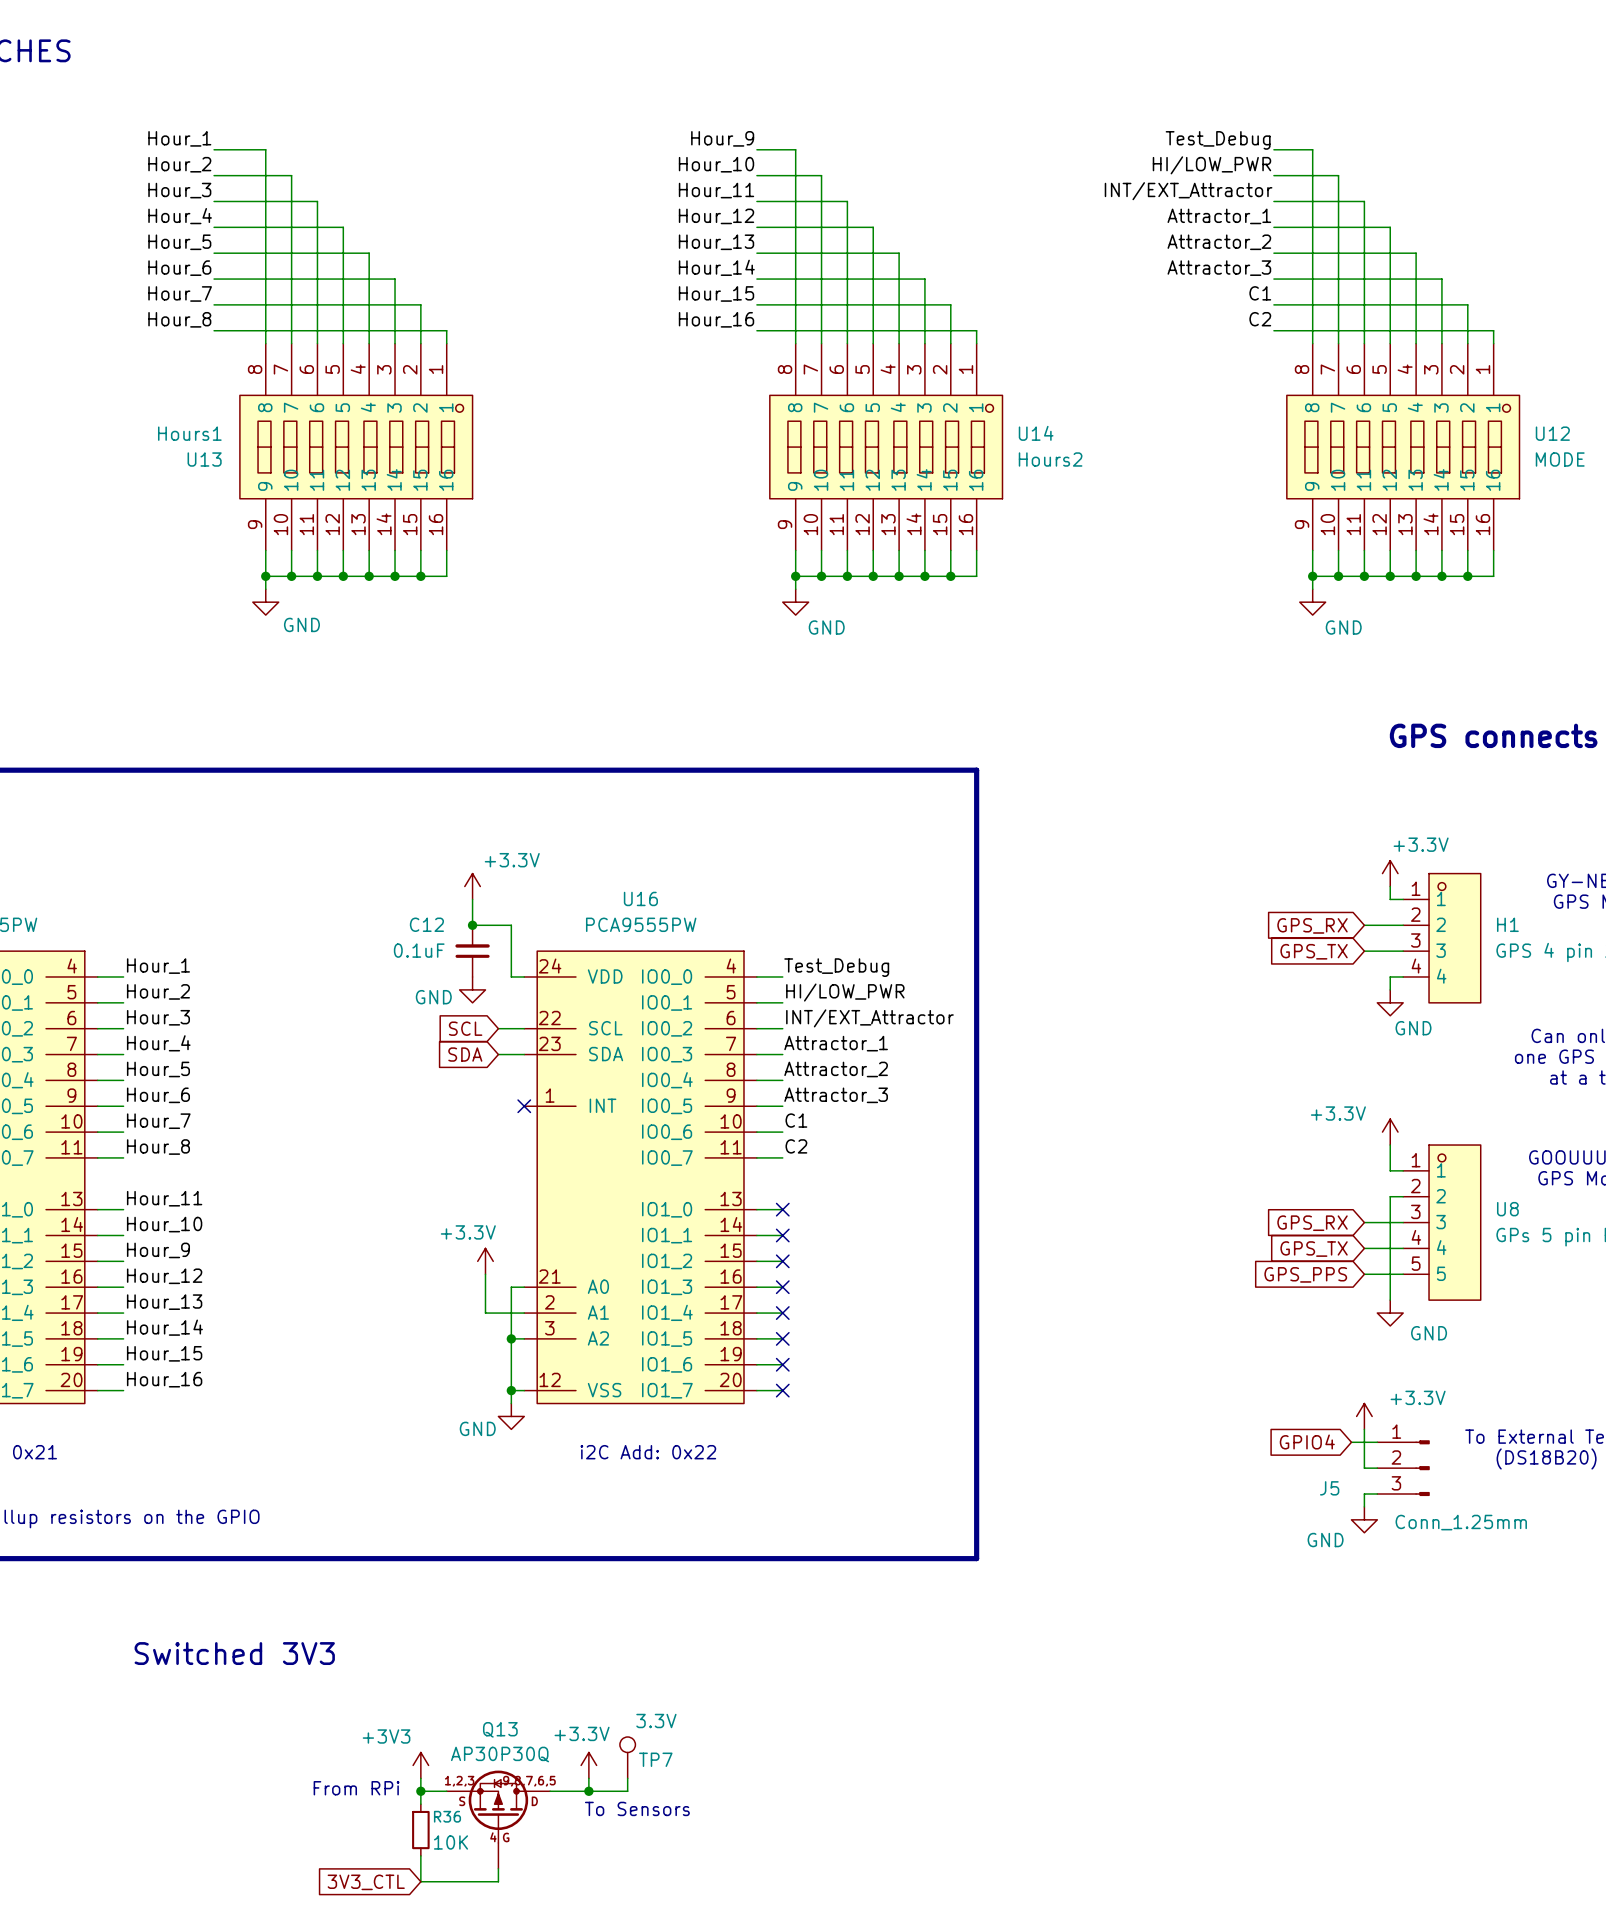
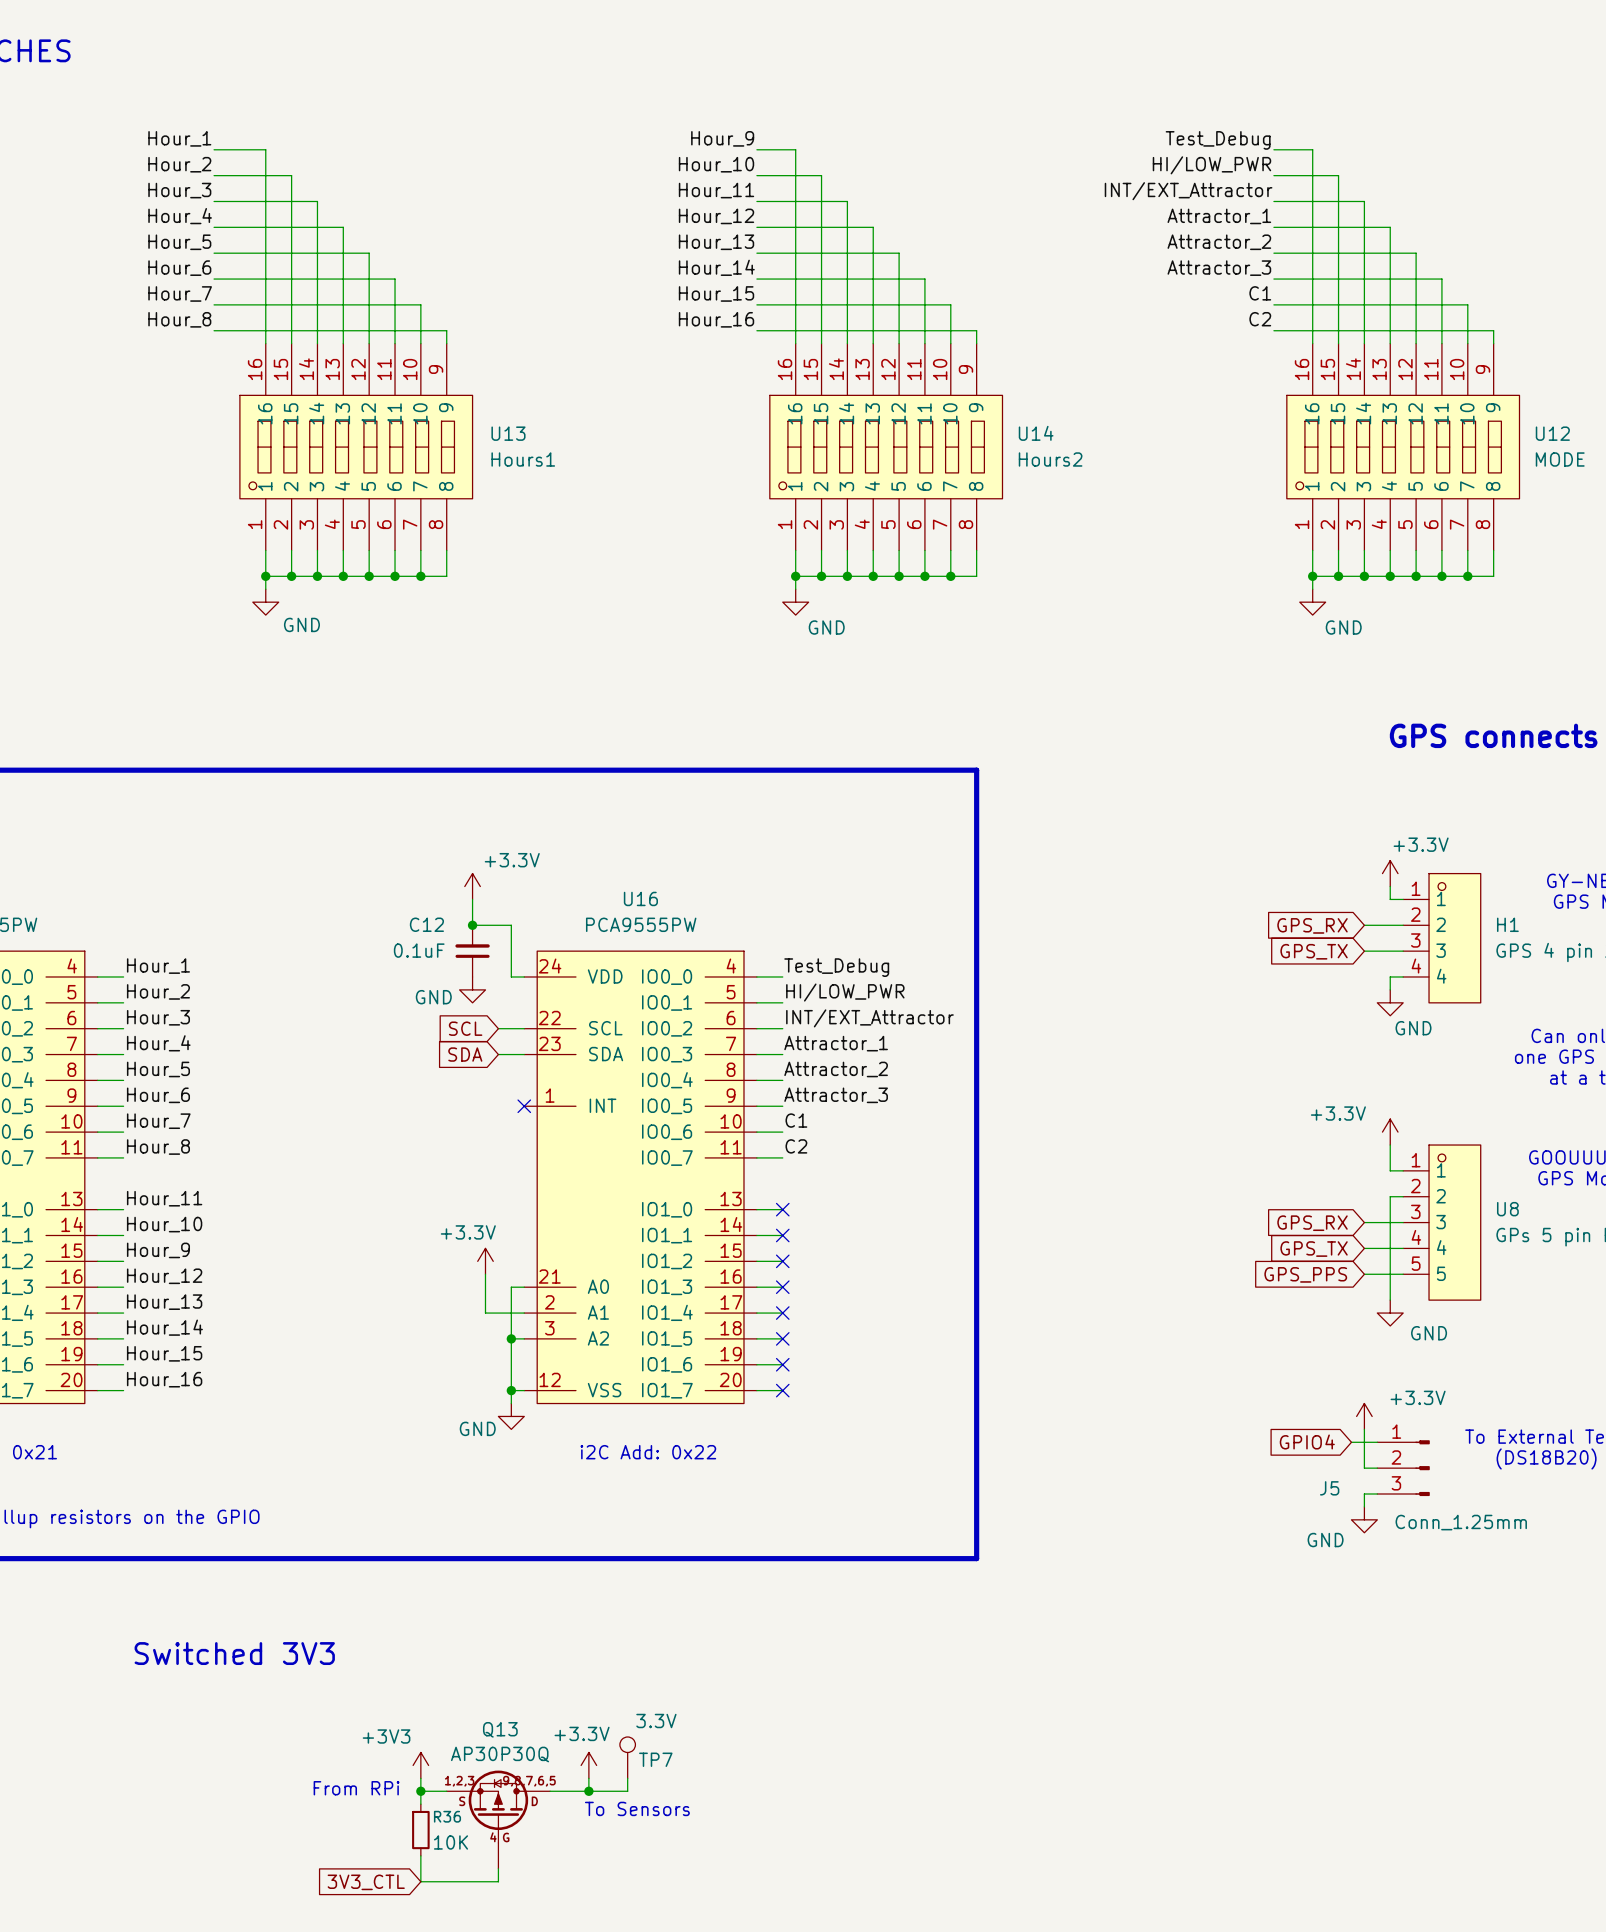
U13 rotation: 0° (356, 447) -> 180° (356, 447)
U14 rotation: 0° (886, 447) -> 180° (886, 447)
U12 rotation: 0° (1403, 447) -> 180° (1403, 447)

